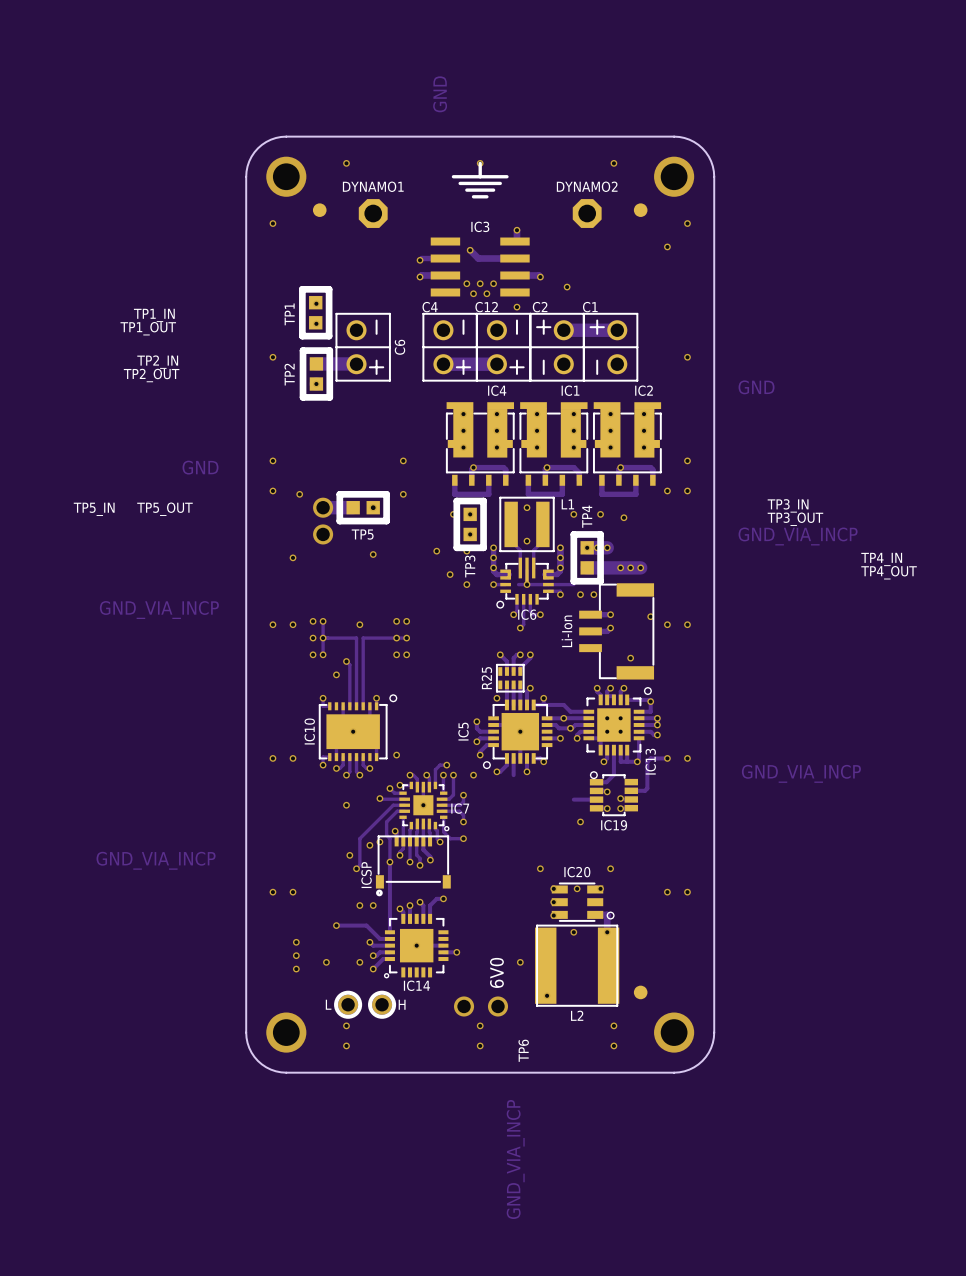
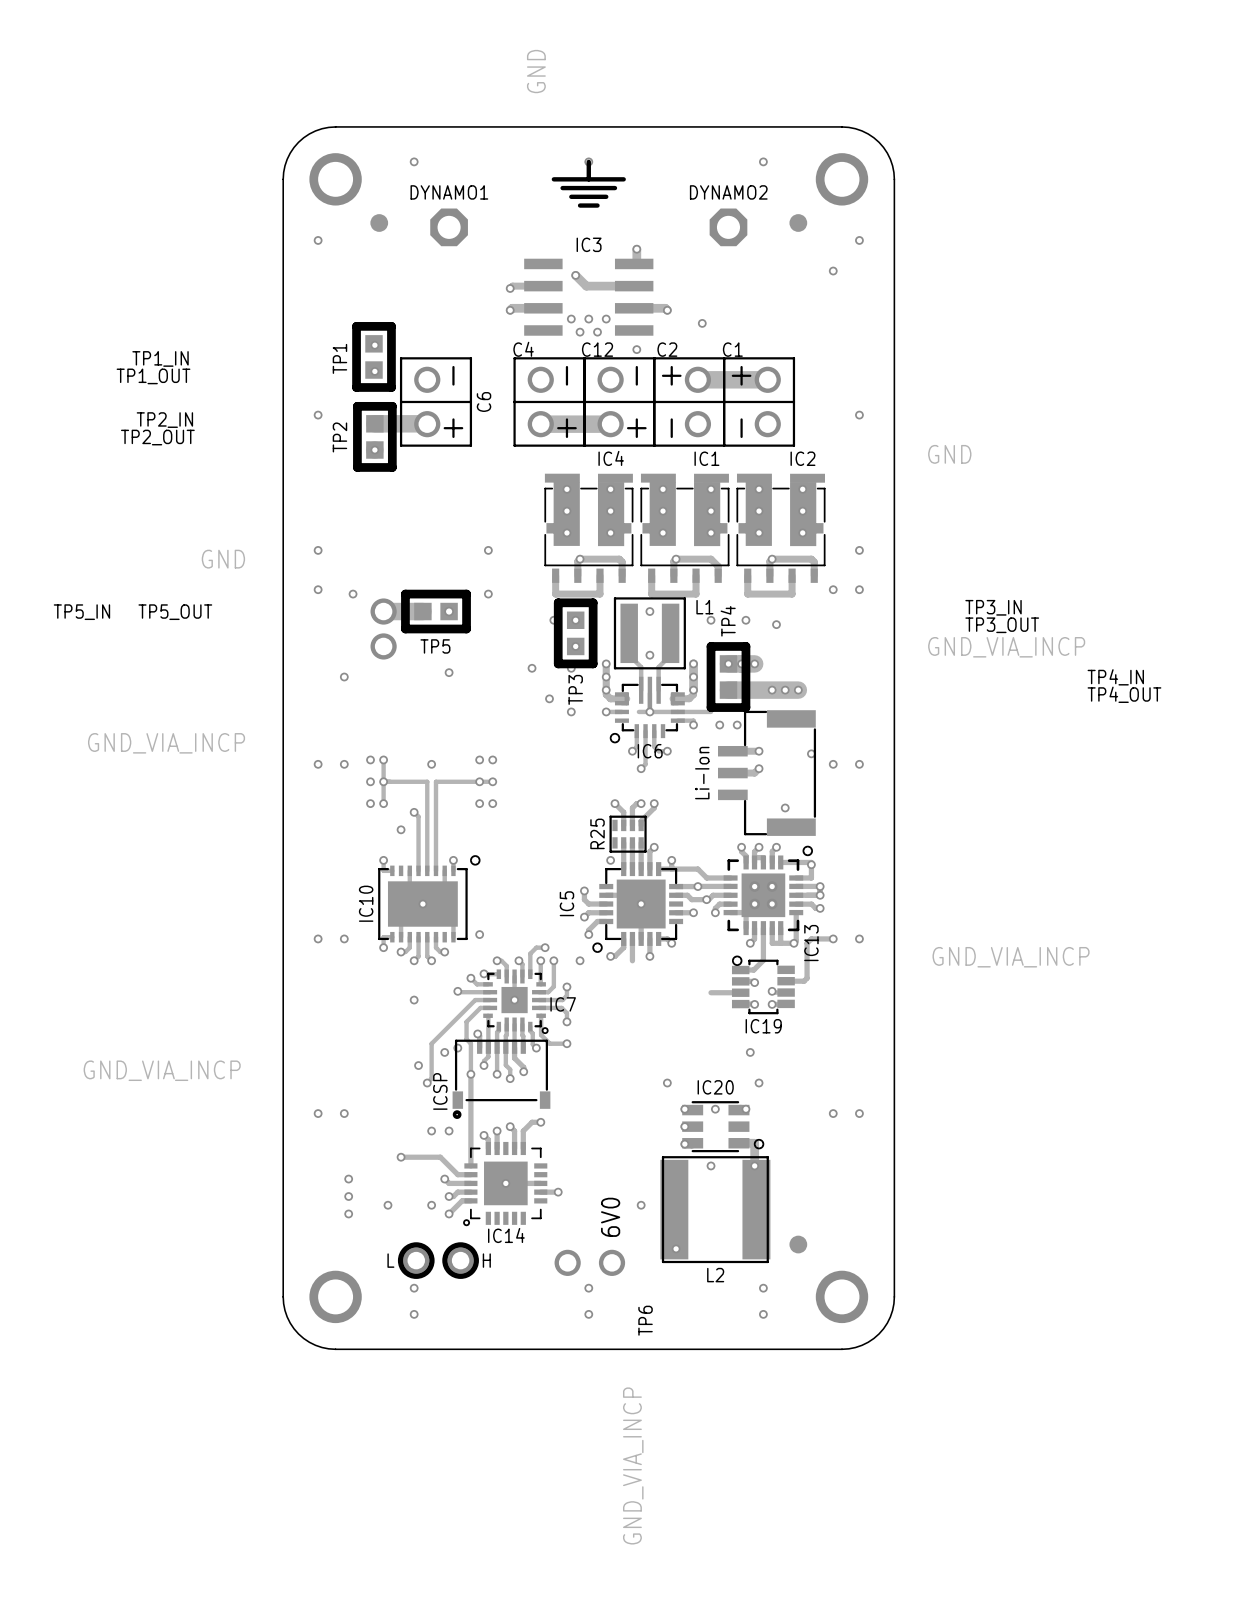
via position: (580, 821) -> (750, 1052)

